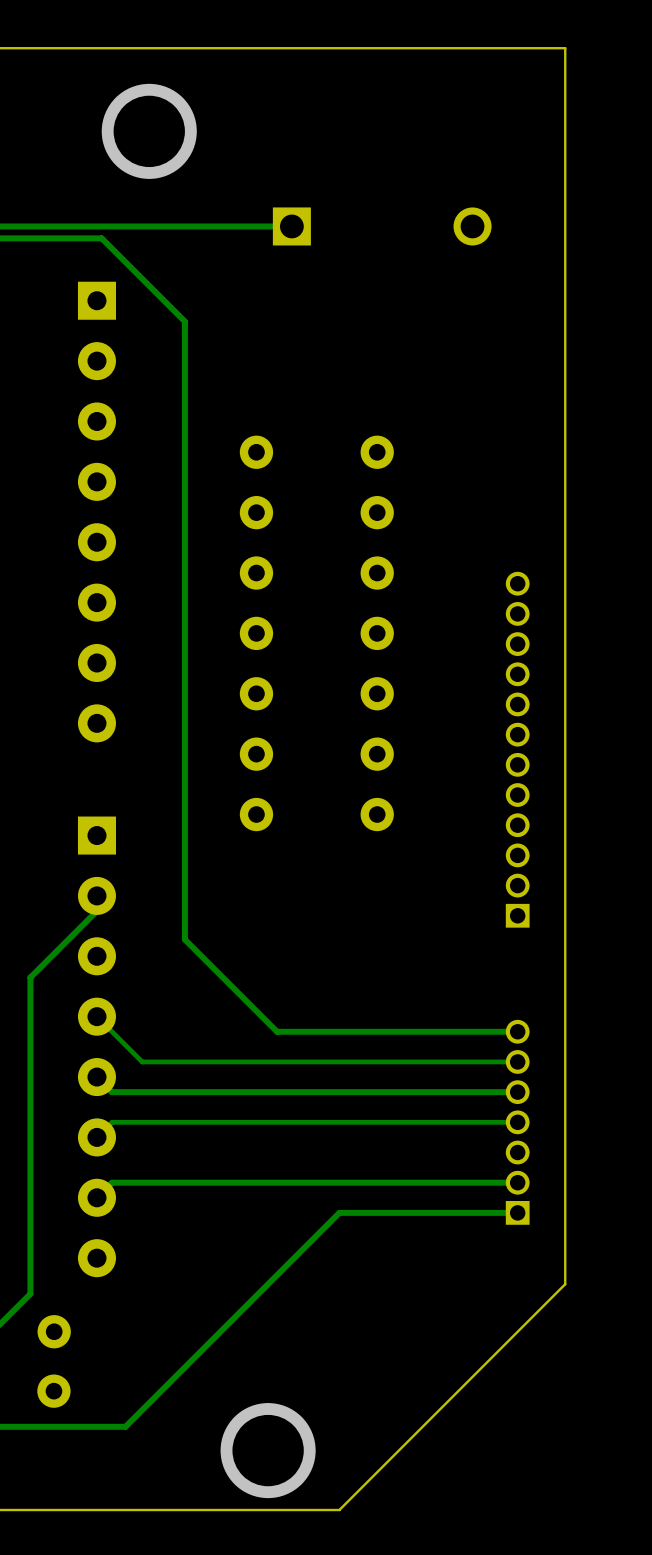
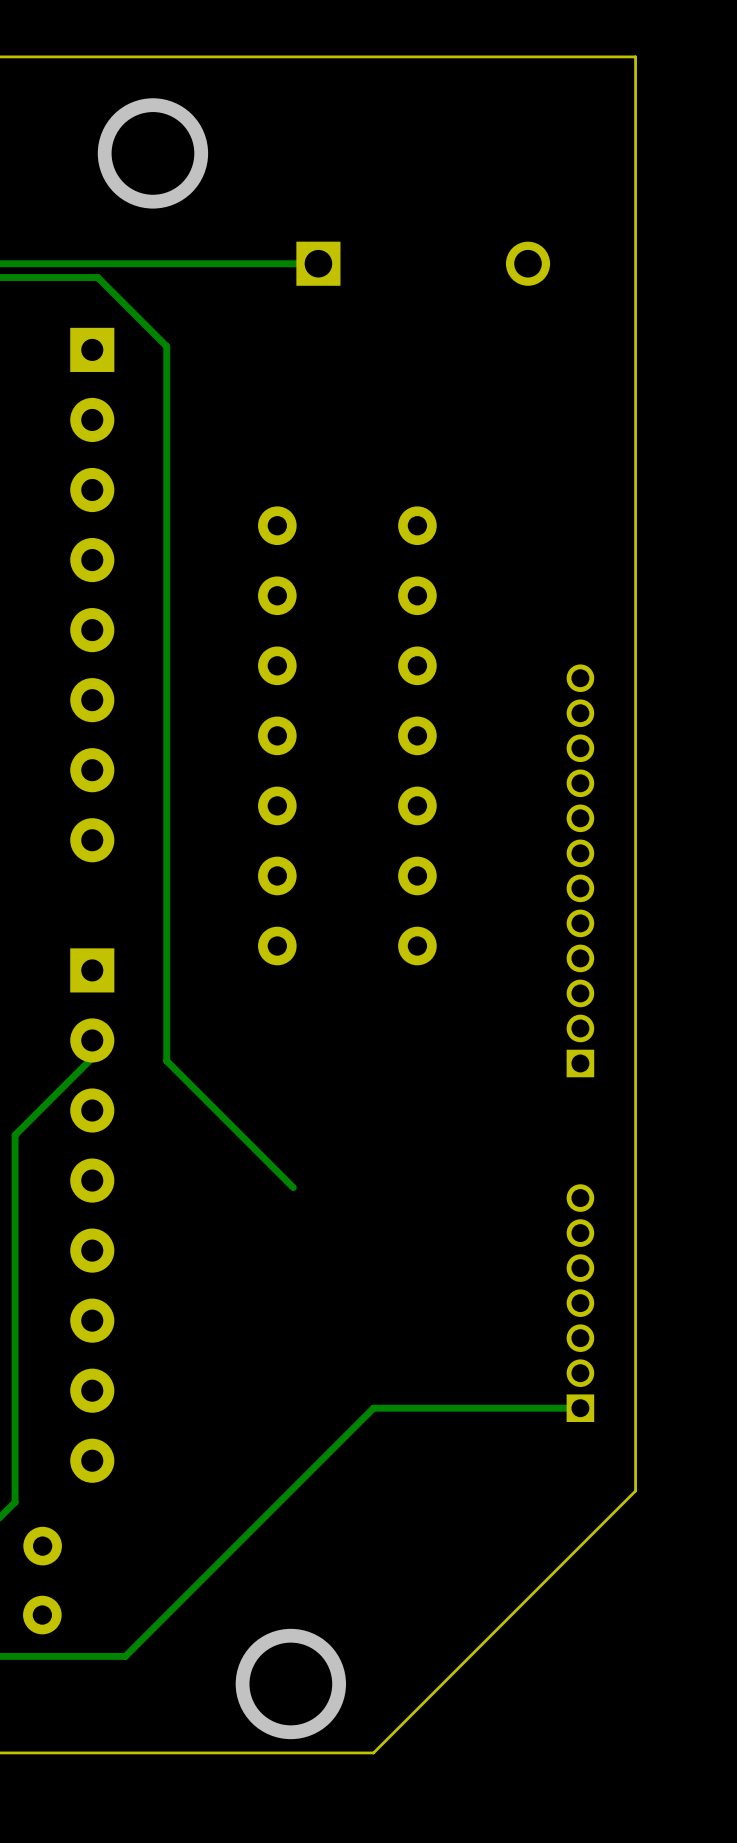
track: (161, 297) (184, 321) (184, 939) (277, 1031) (517, 1031) -> (166, 346) (166, 1061) (293, 1187)
track: (96, 1016) (142, 1061) (517, 1061) -> none
track: (96, 1077) (112, 1092) (517, 1092) -> none
track: (517, 1122) (112, 1122) (96, 1137) -> none
track: (517, 1182) (112, 1182) (96, 1197) -> none

